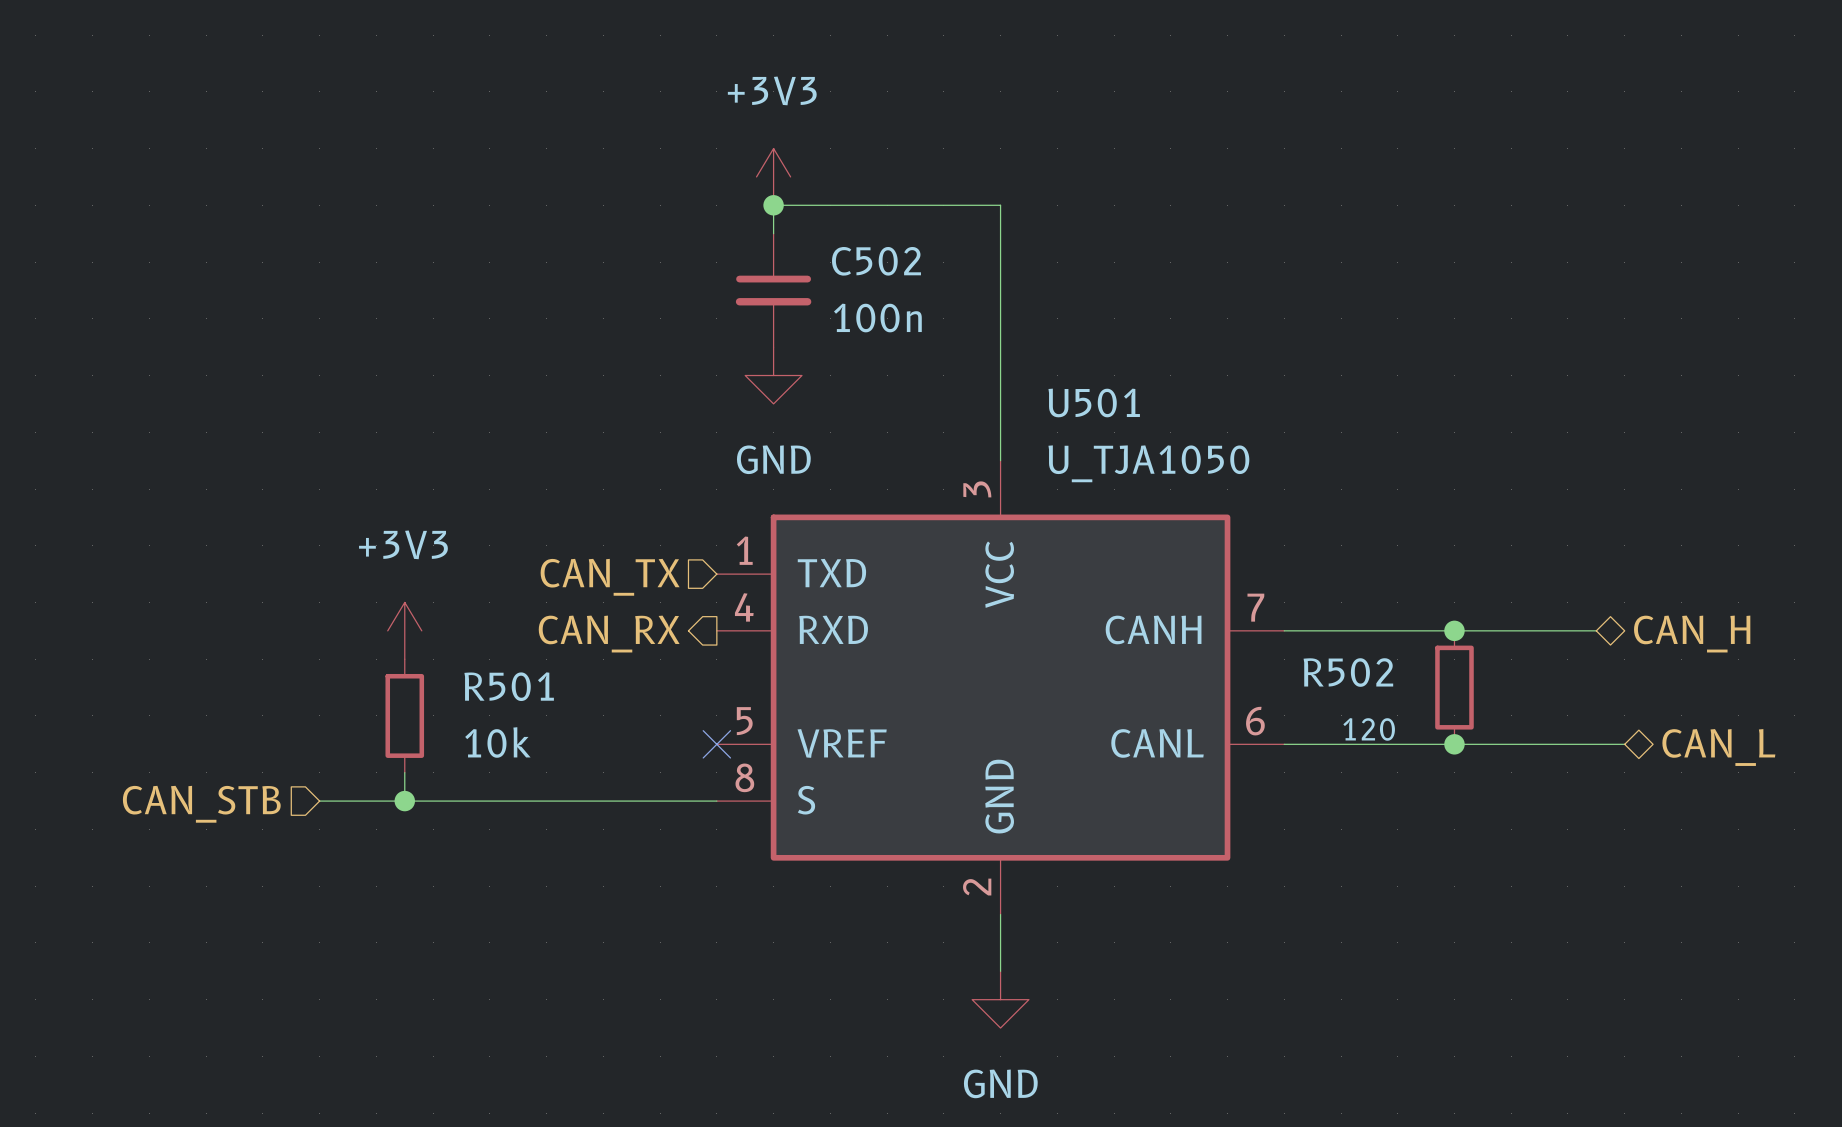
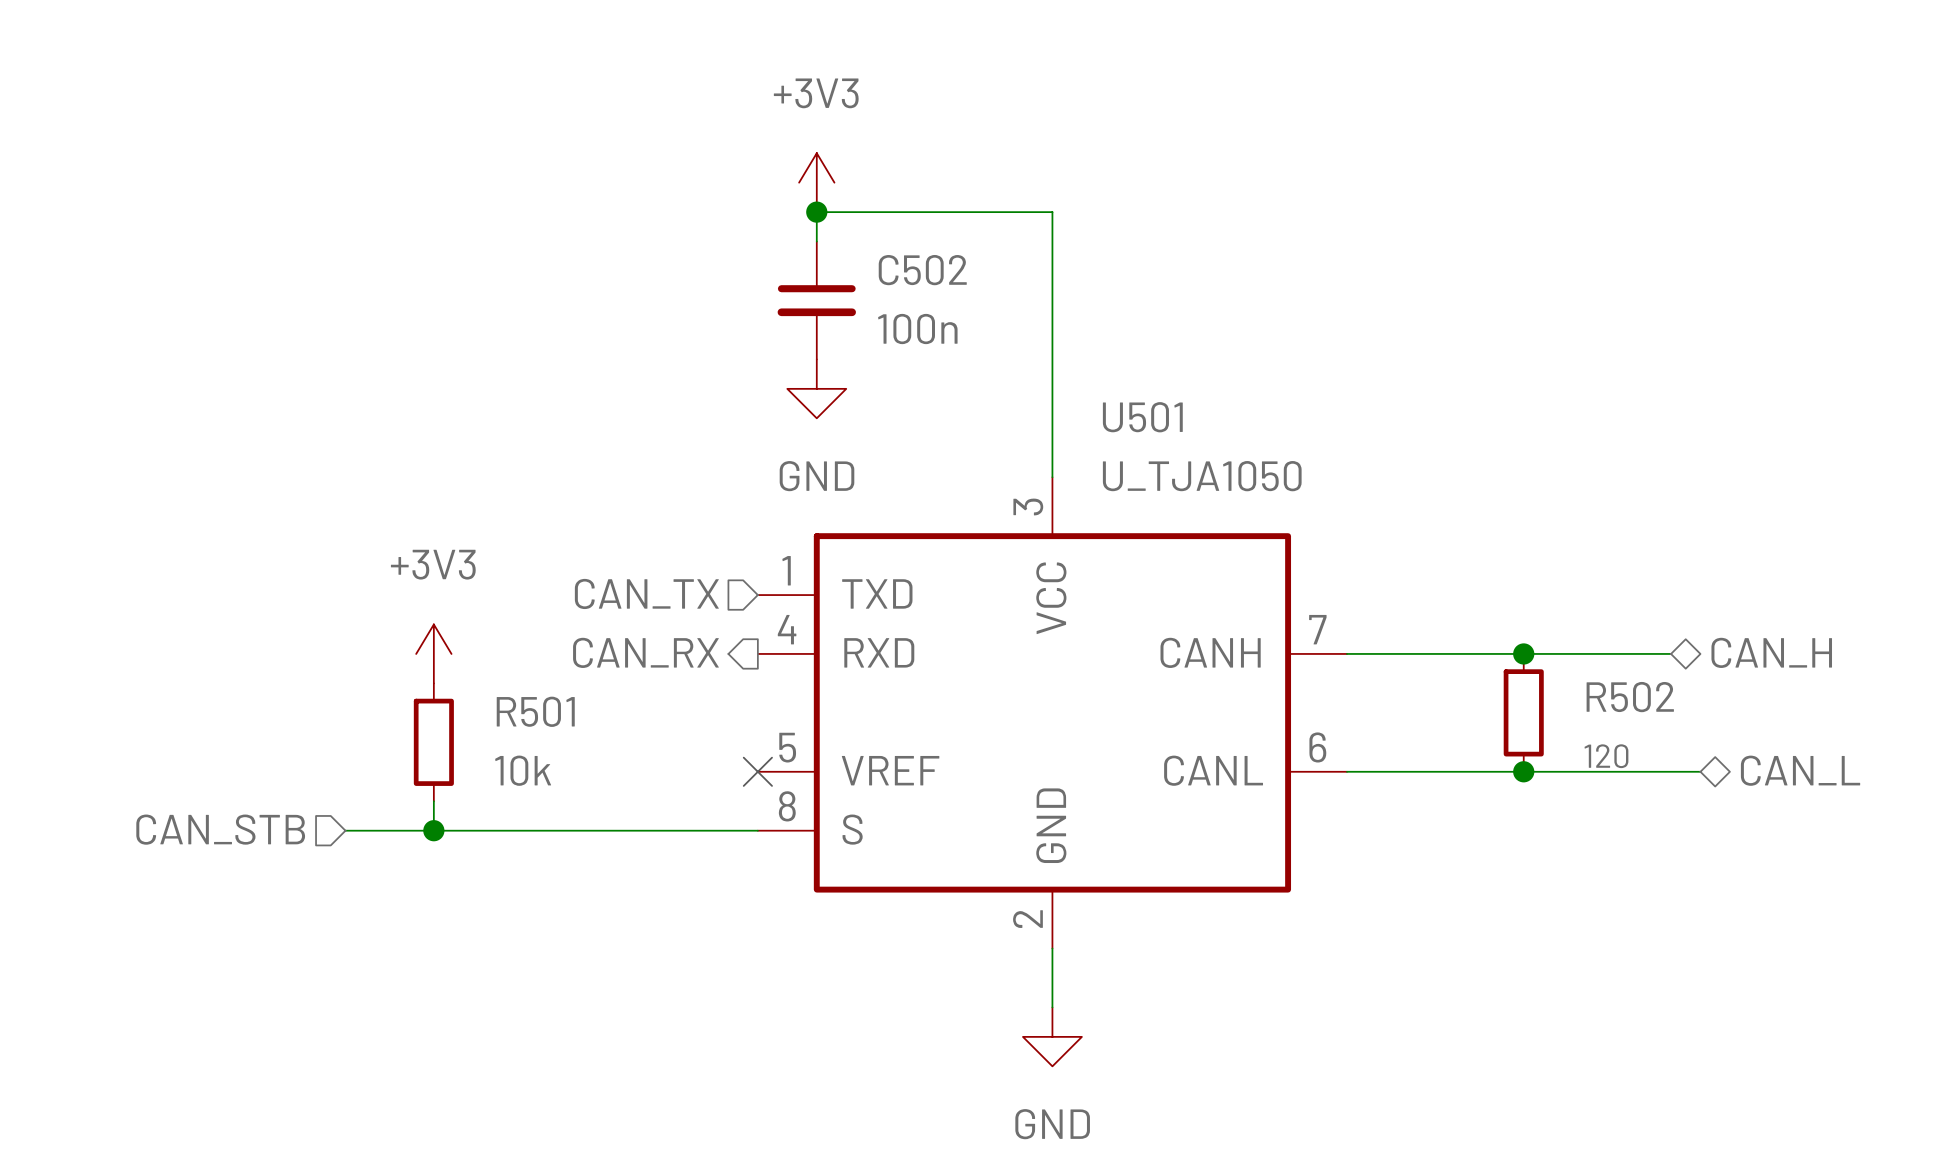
R502 name position: R502 (1348, 672) -> R502 (1630, 697)
R502 text position: 120 (1369, 729) -> 120 (1606, 756)

